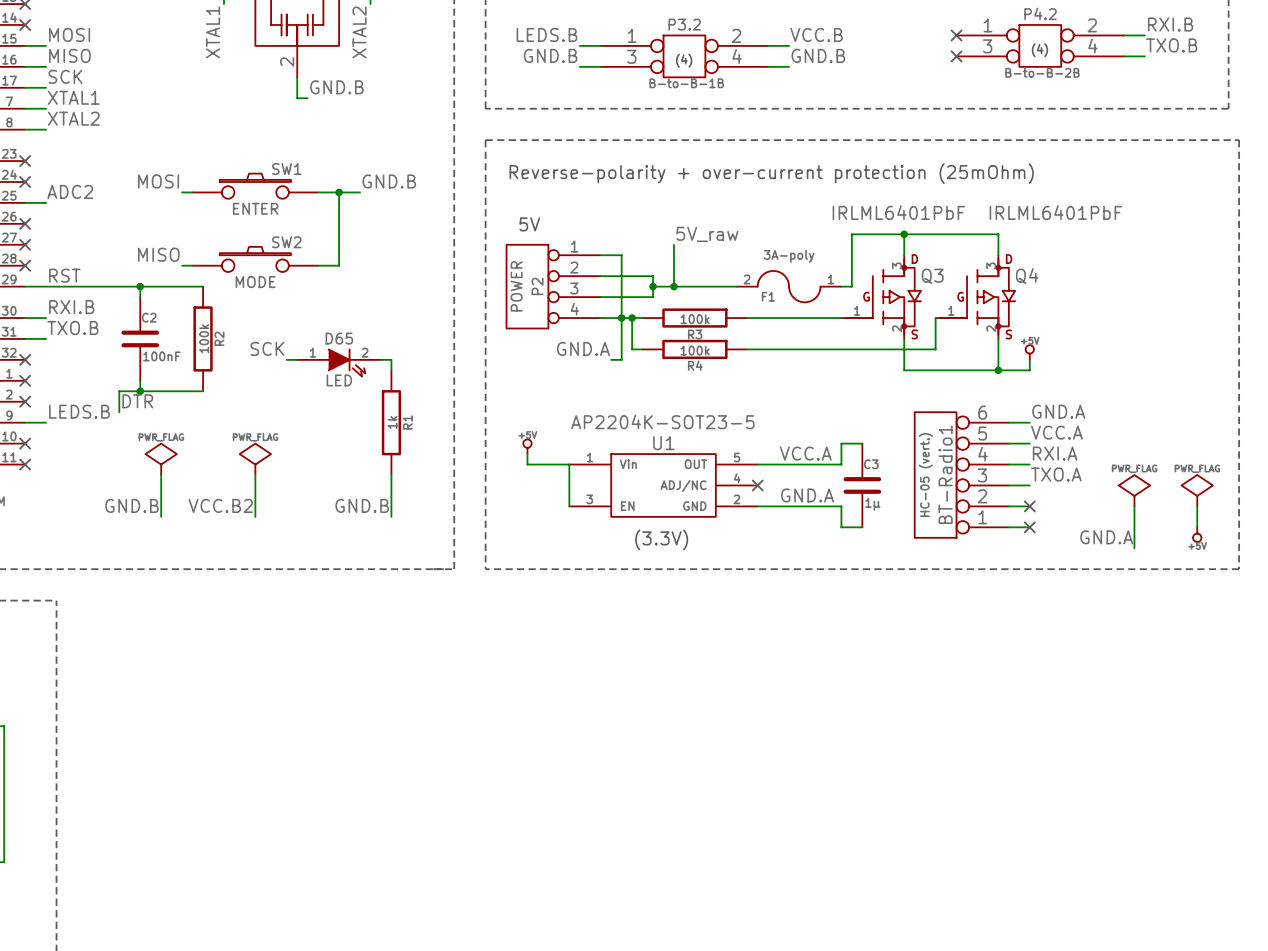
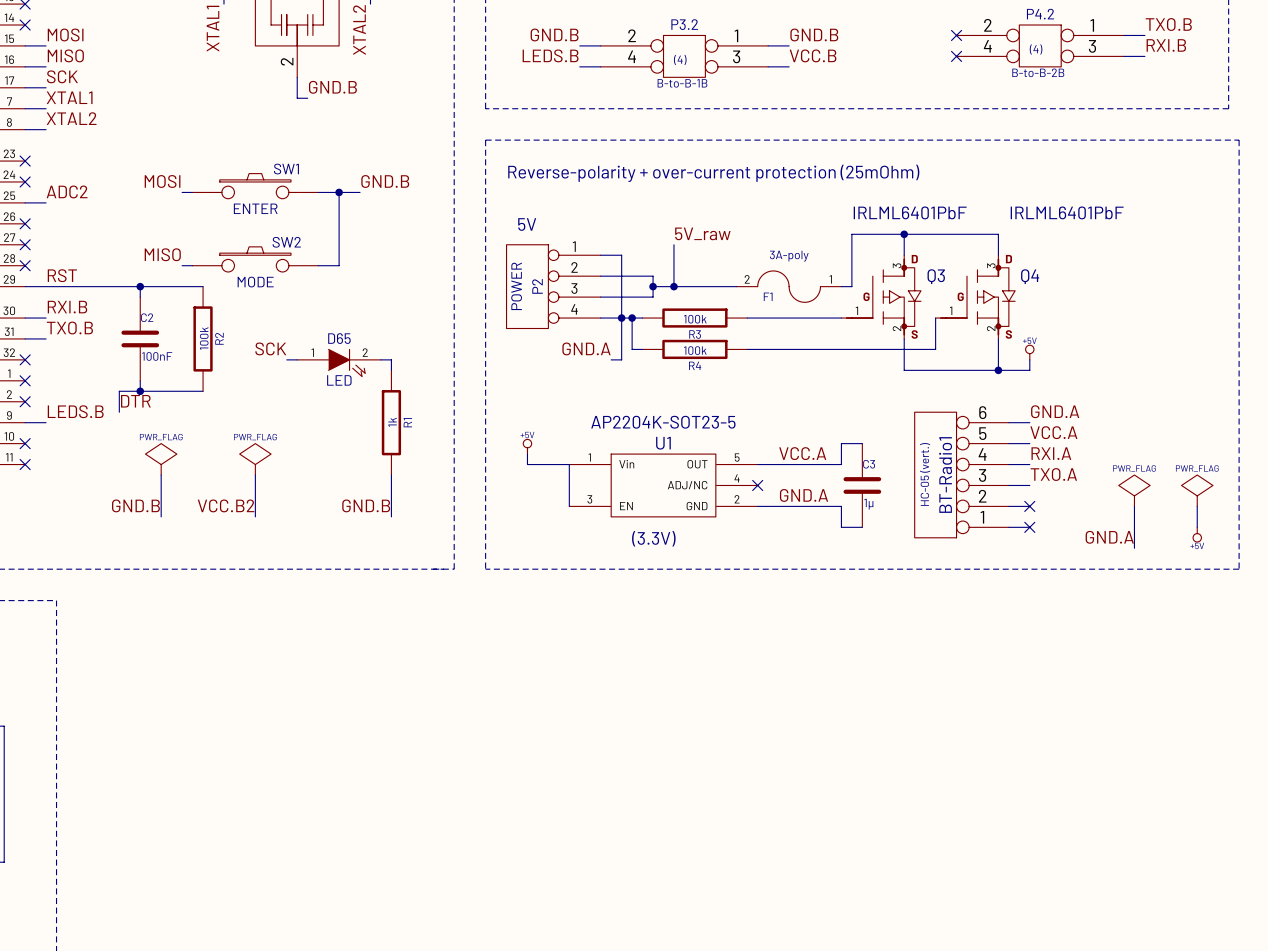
label: RXI.B (1170, 24) -> TXO.B (1168, 24)
label: LEDS.B (546, 34) -> GND.B (554, 34)
label: VCC.B (816, 34) -> GND.B (814, 34)
P4.2 flip: as is (1040, 45) -> left-right (1040, 45)
label: TXO.B (1171, 45) -> RXI.B (1166, 45)
label: GND.B (550, 55) -> LEDS.B (550, 55)
label: GND.B (818, 55) -> VCC.B (813, 55)
P3.2 flip: as is (684, 56) -> left-right (684, 56)

